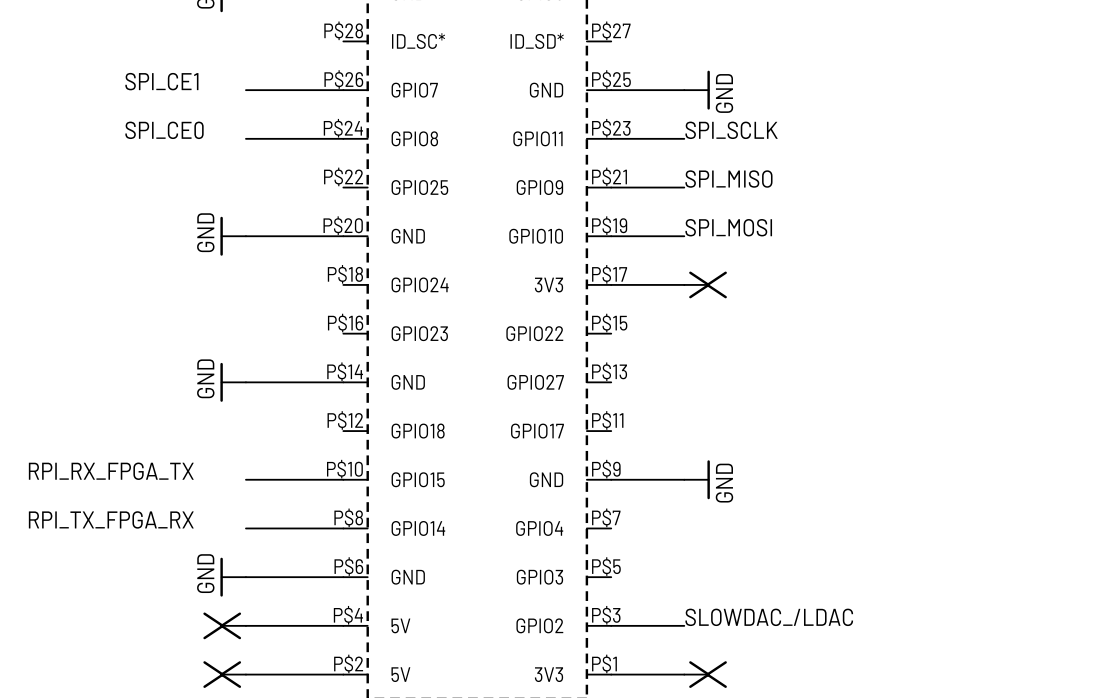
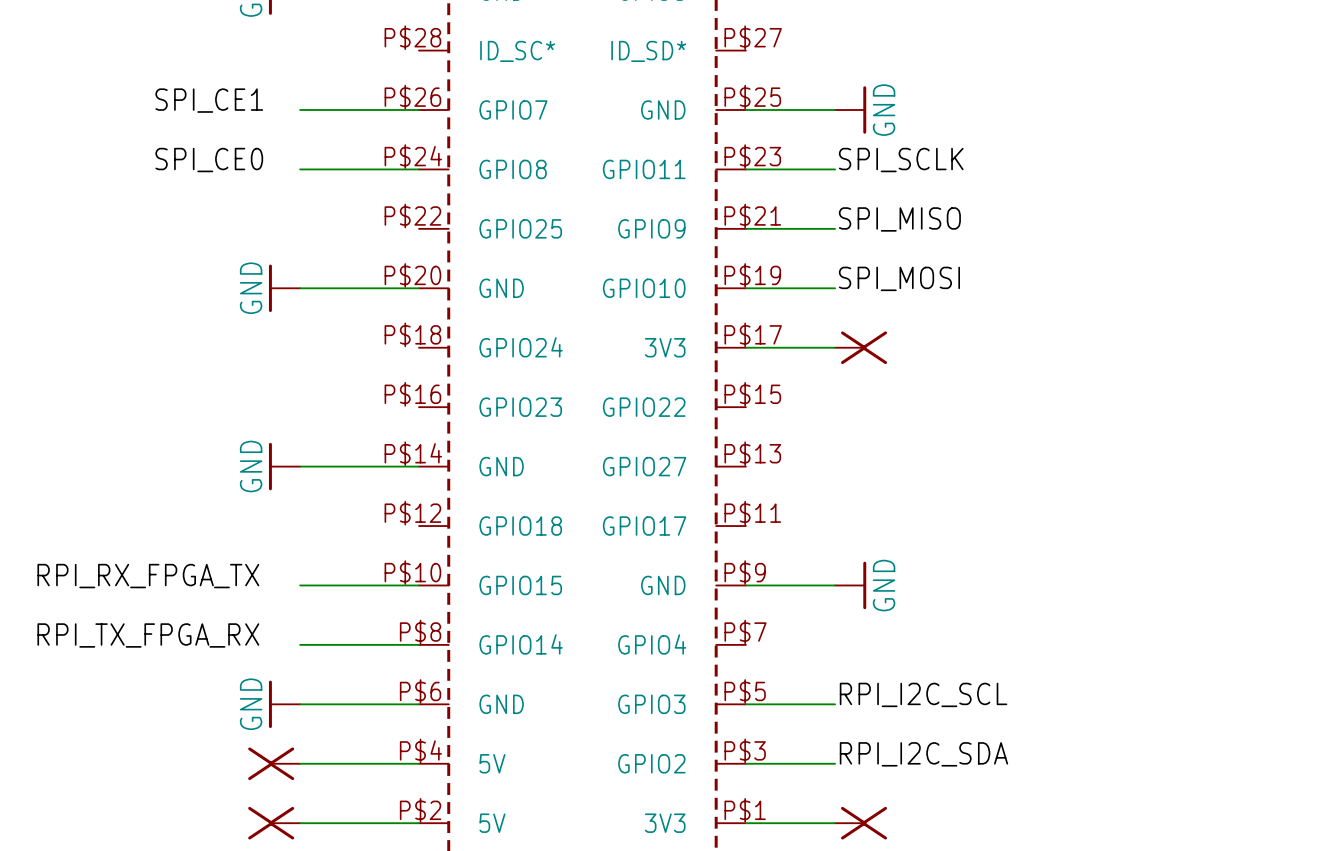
label: none -> RPI_I2C_SCL (923, 694)
wire: none -> (745, 704) (835, 704)
label: SLOWDAC_/LDAC (769, 617) -> RPI_I2C_SDA (923, 754)

